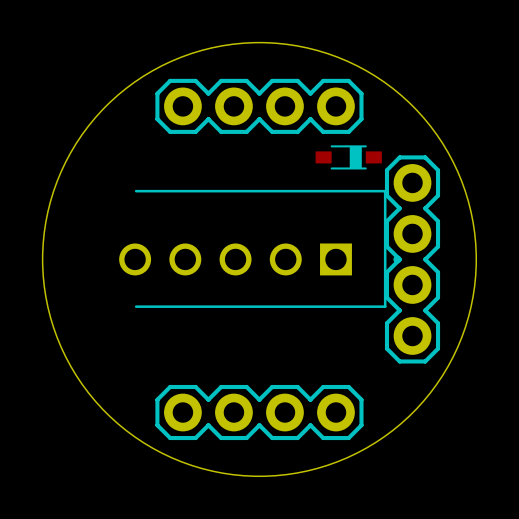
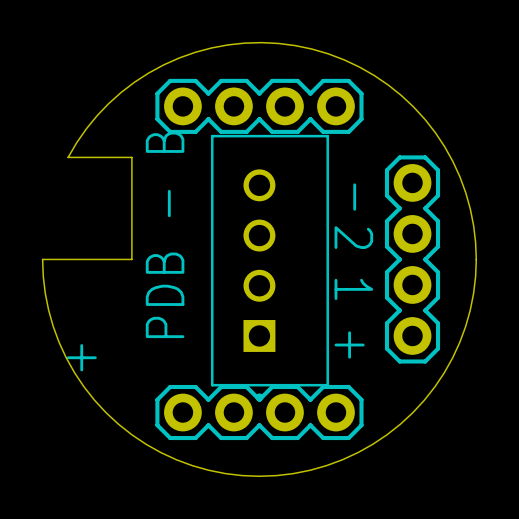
round board edge: [42, 42, 477, 477] -> none
board edge: none -> (68, 157) (131, 157) (131, 259) (42, 259) (45, 293) (53, 326) (74, 372) (94, 400) (118, 424) (161, 452) (192, 465) (242, 475) (293, 473) (326, 465) (372, 444) (400, 424) (424, 400) (452, 357) (465, 326) (475, 276) (475, 242) (465, 192) (452, 161) (425, 119) (401, 95) (359, 67) (312, 49) (278, 43) (228, 44) (195, 52) (163, 64) (121, 92) (97, 115) (68, 157)
part: (348, 157) -> none
text: none -> - (354, 197)
text: none -> PDB - B (165, 234)
text: none -> 2 (353, 237)
part: (260, 248) -> none
part: none -> (270, 268)
text: none -> 1 (353, 289)
text: none -> + (349, 345)
text: none -> + (81, 357)

